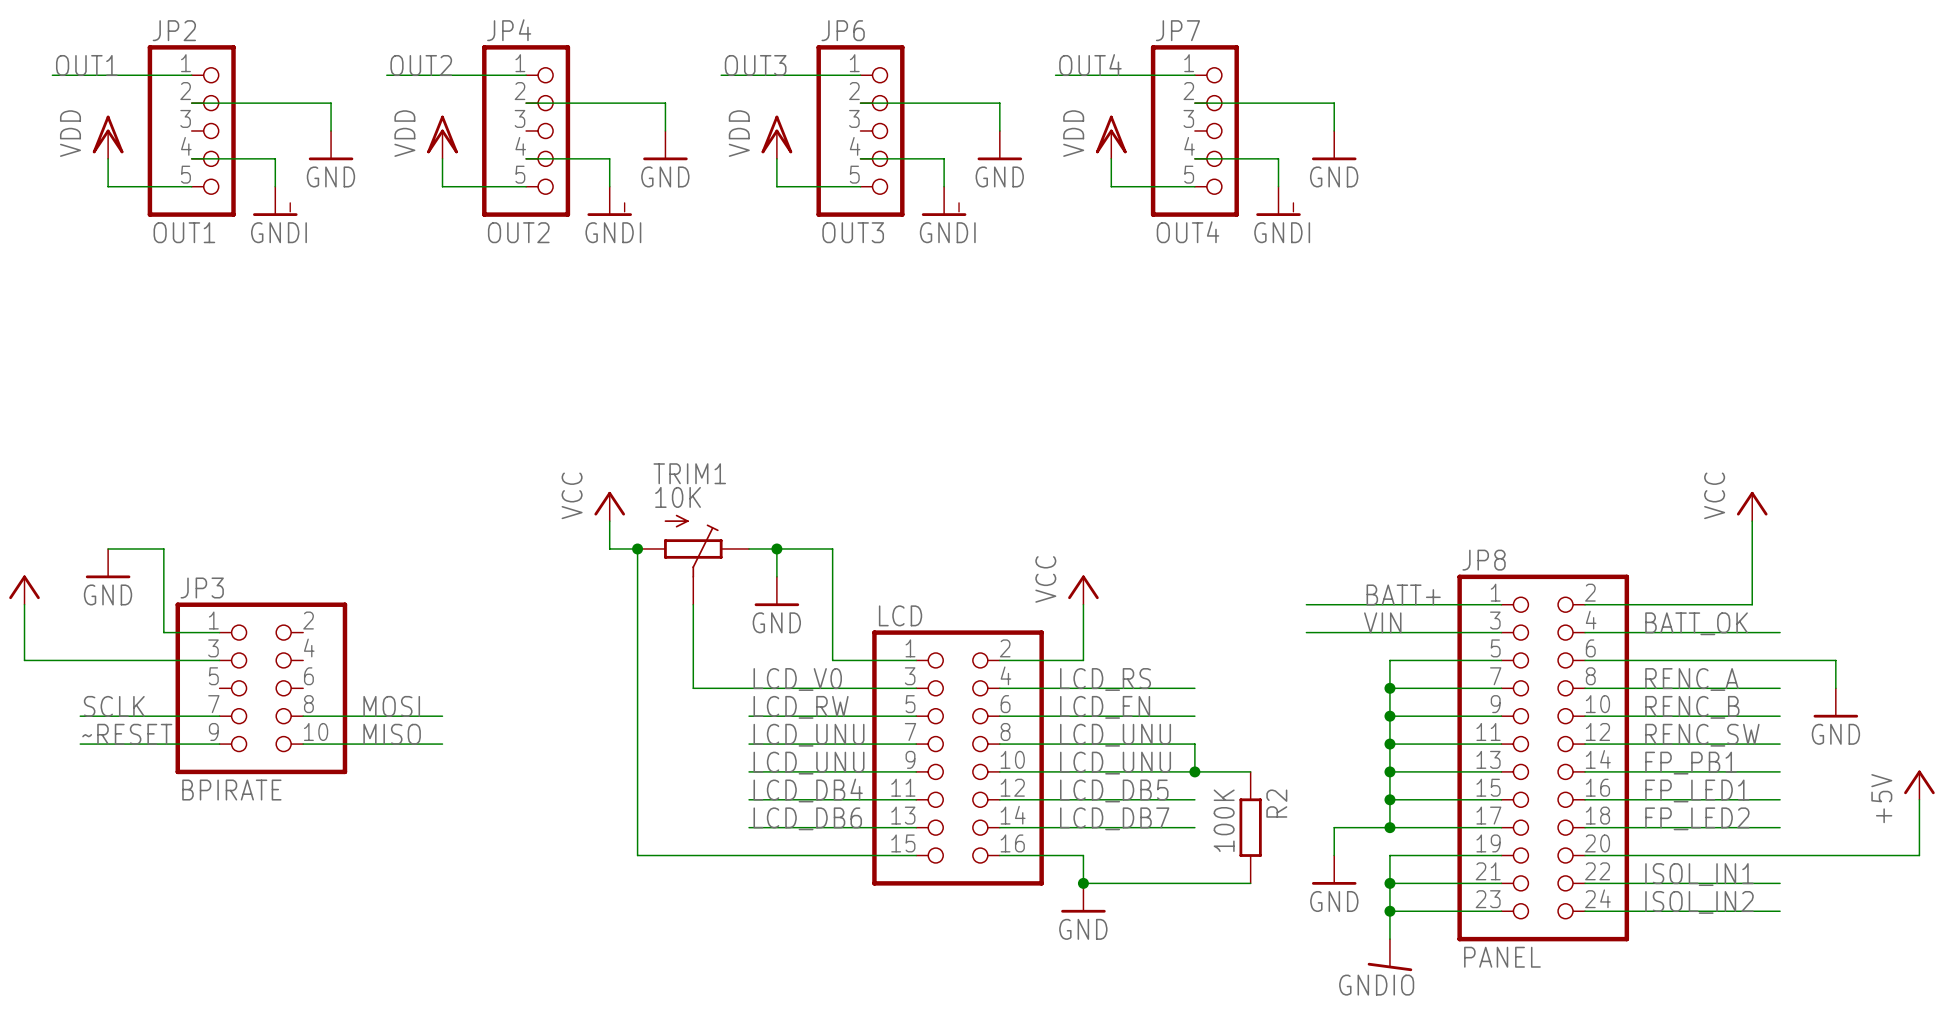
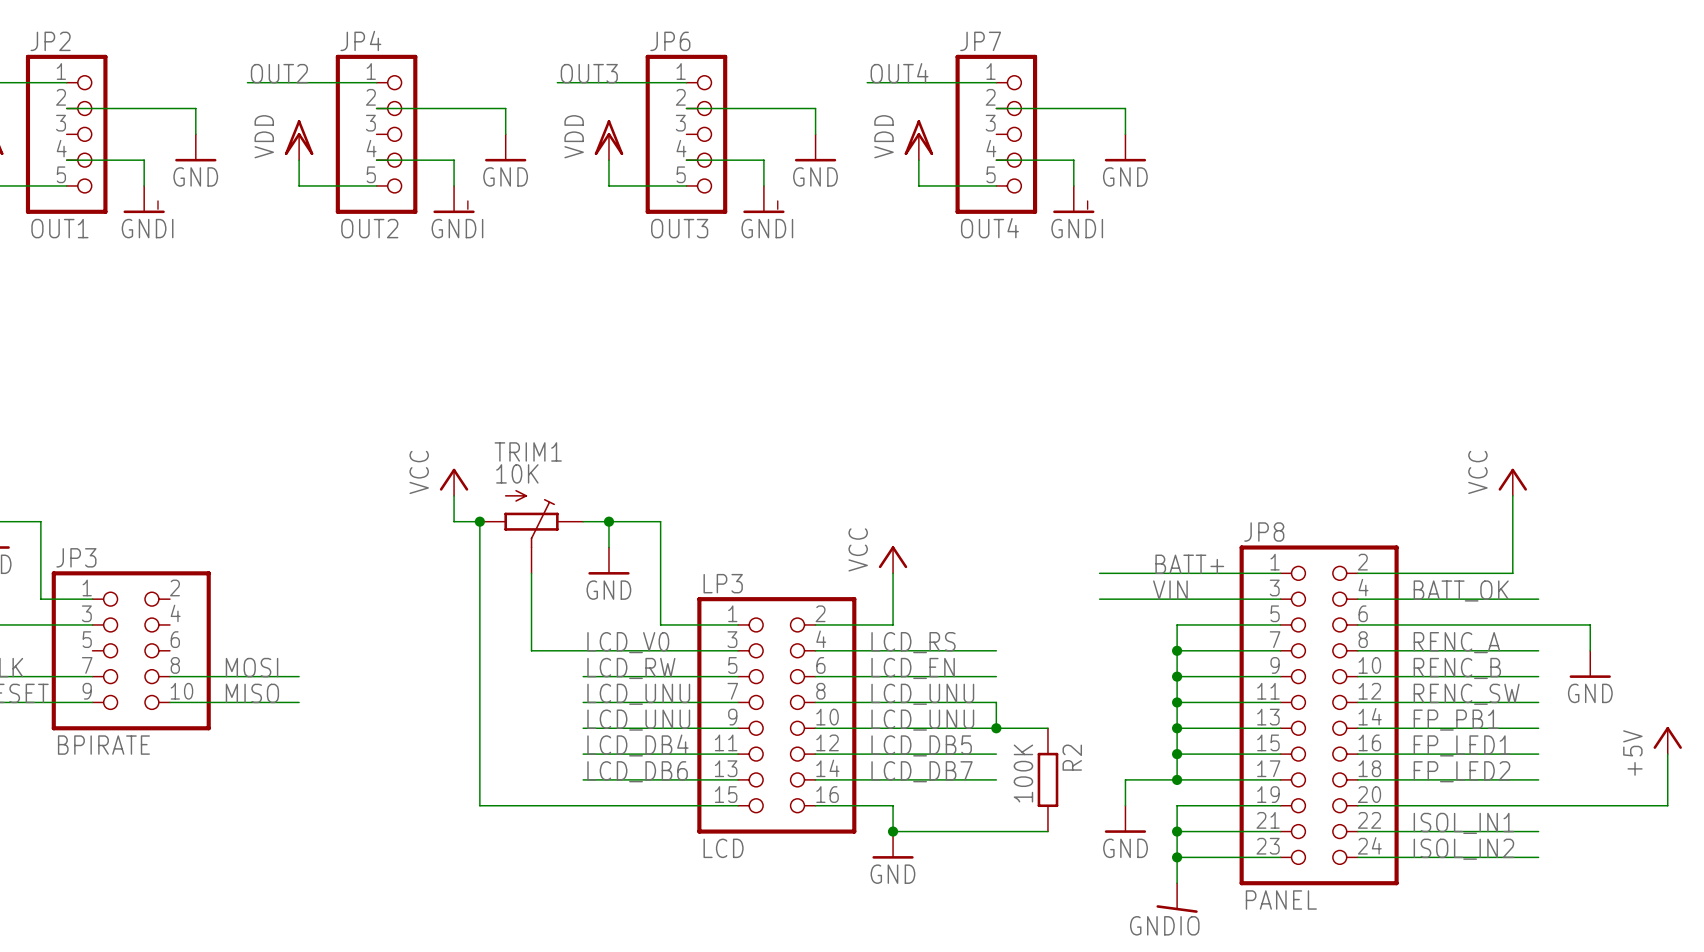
LCD name: LCD (900, 615) -> LP3 (723, 583)
LCD value: none -> LCD (723, 848)

